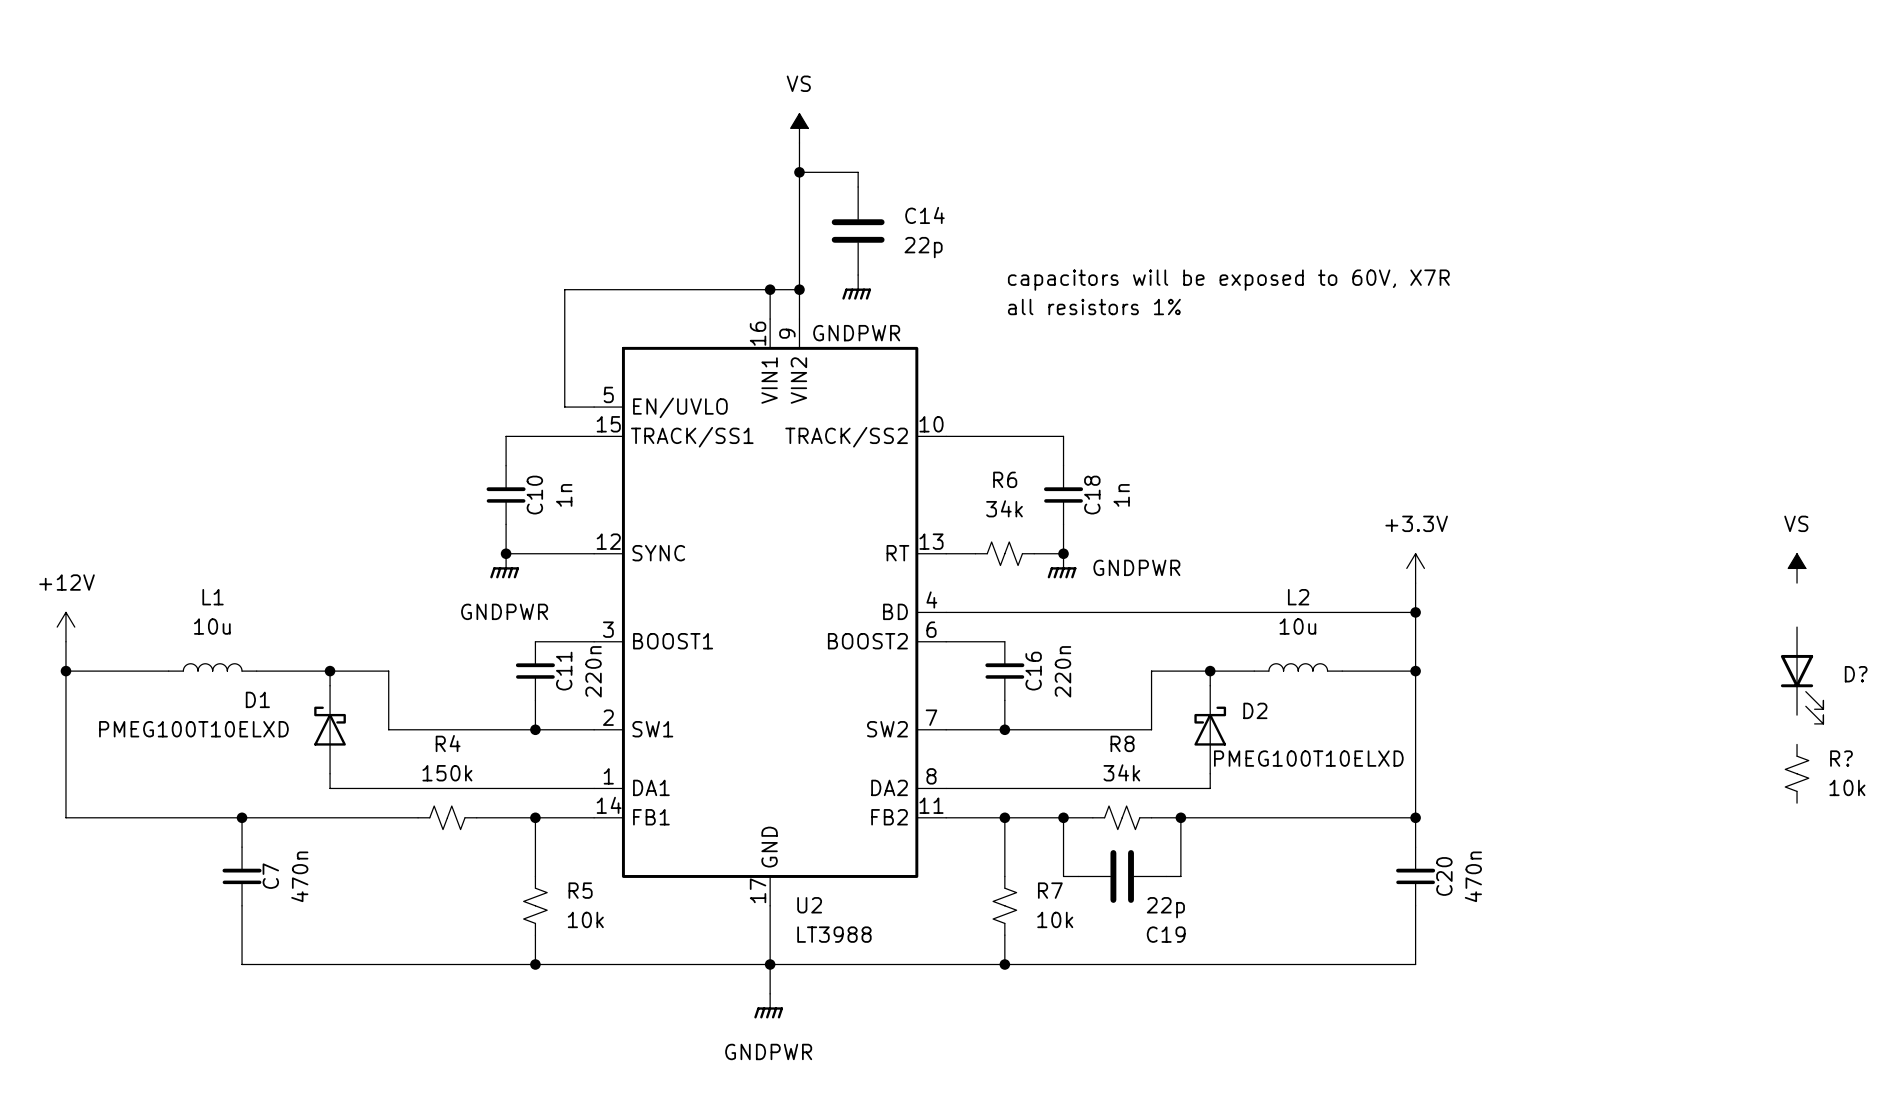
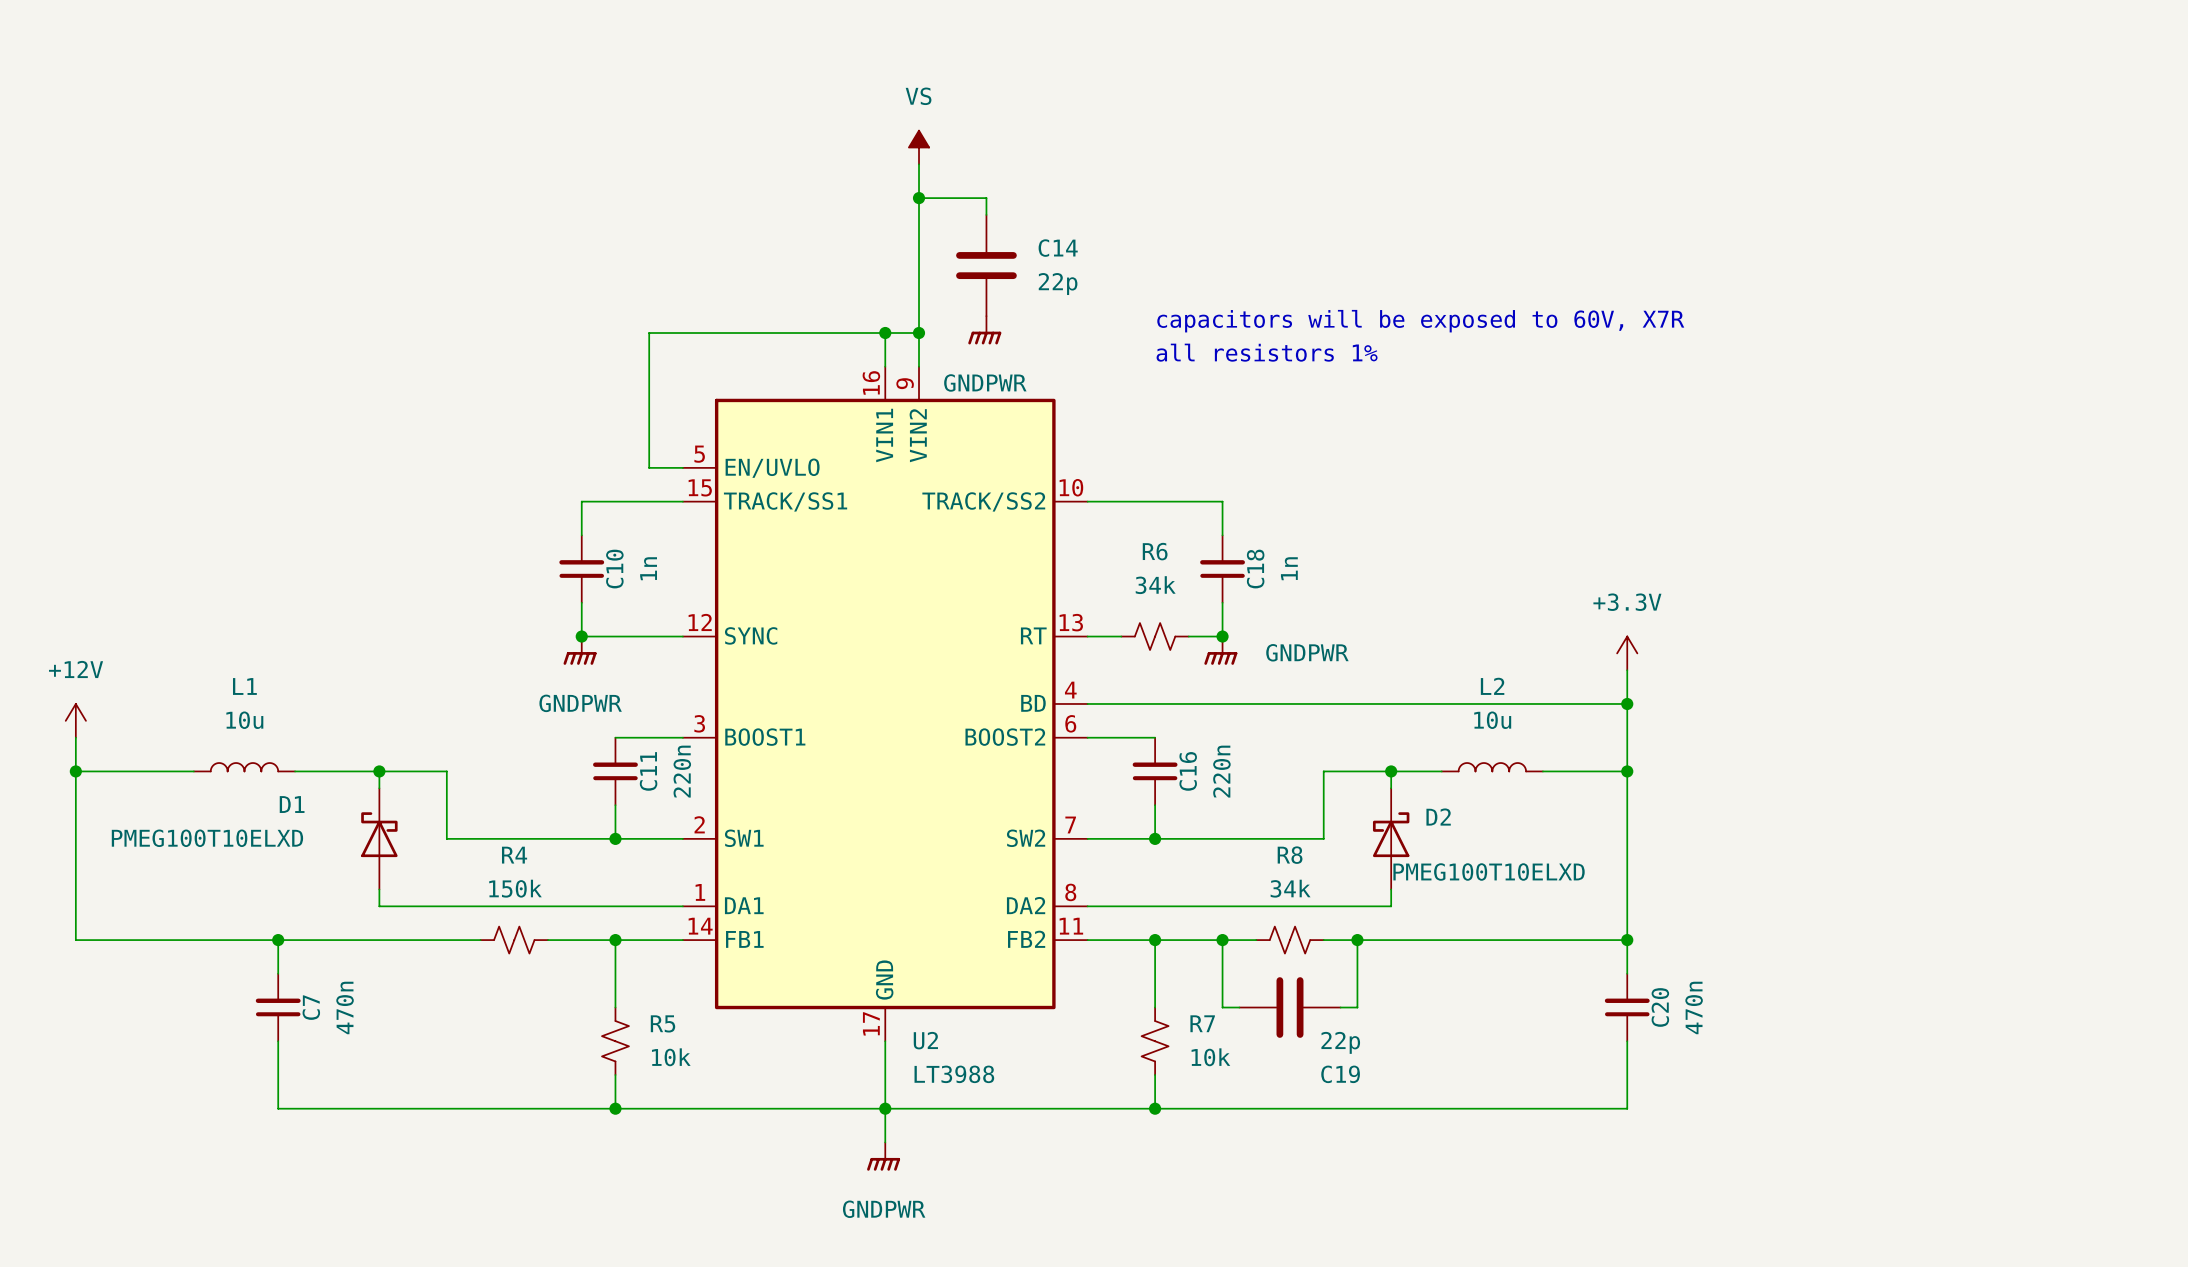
power symbol: VS (1797, 568) -> none
D?: (1802, 675) -> none
R?: 10k (1797, 773) -> none

